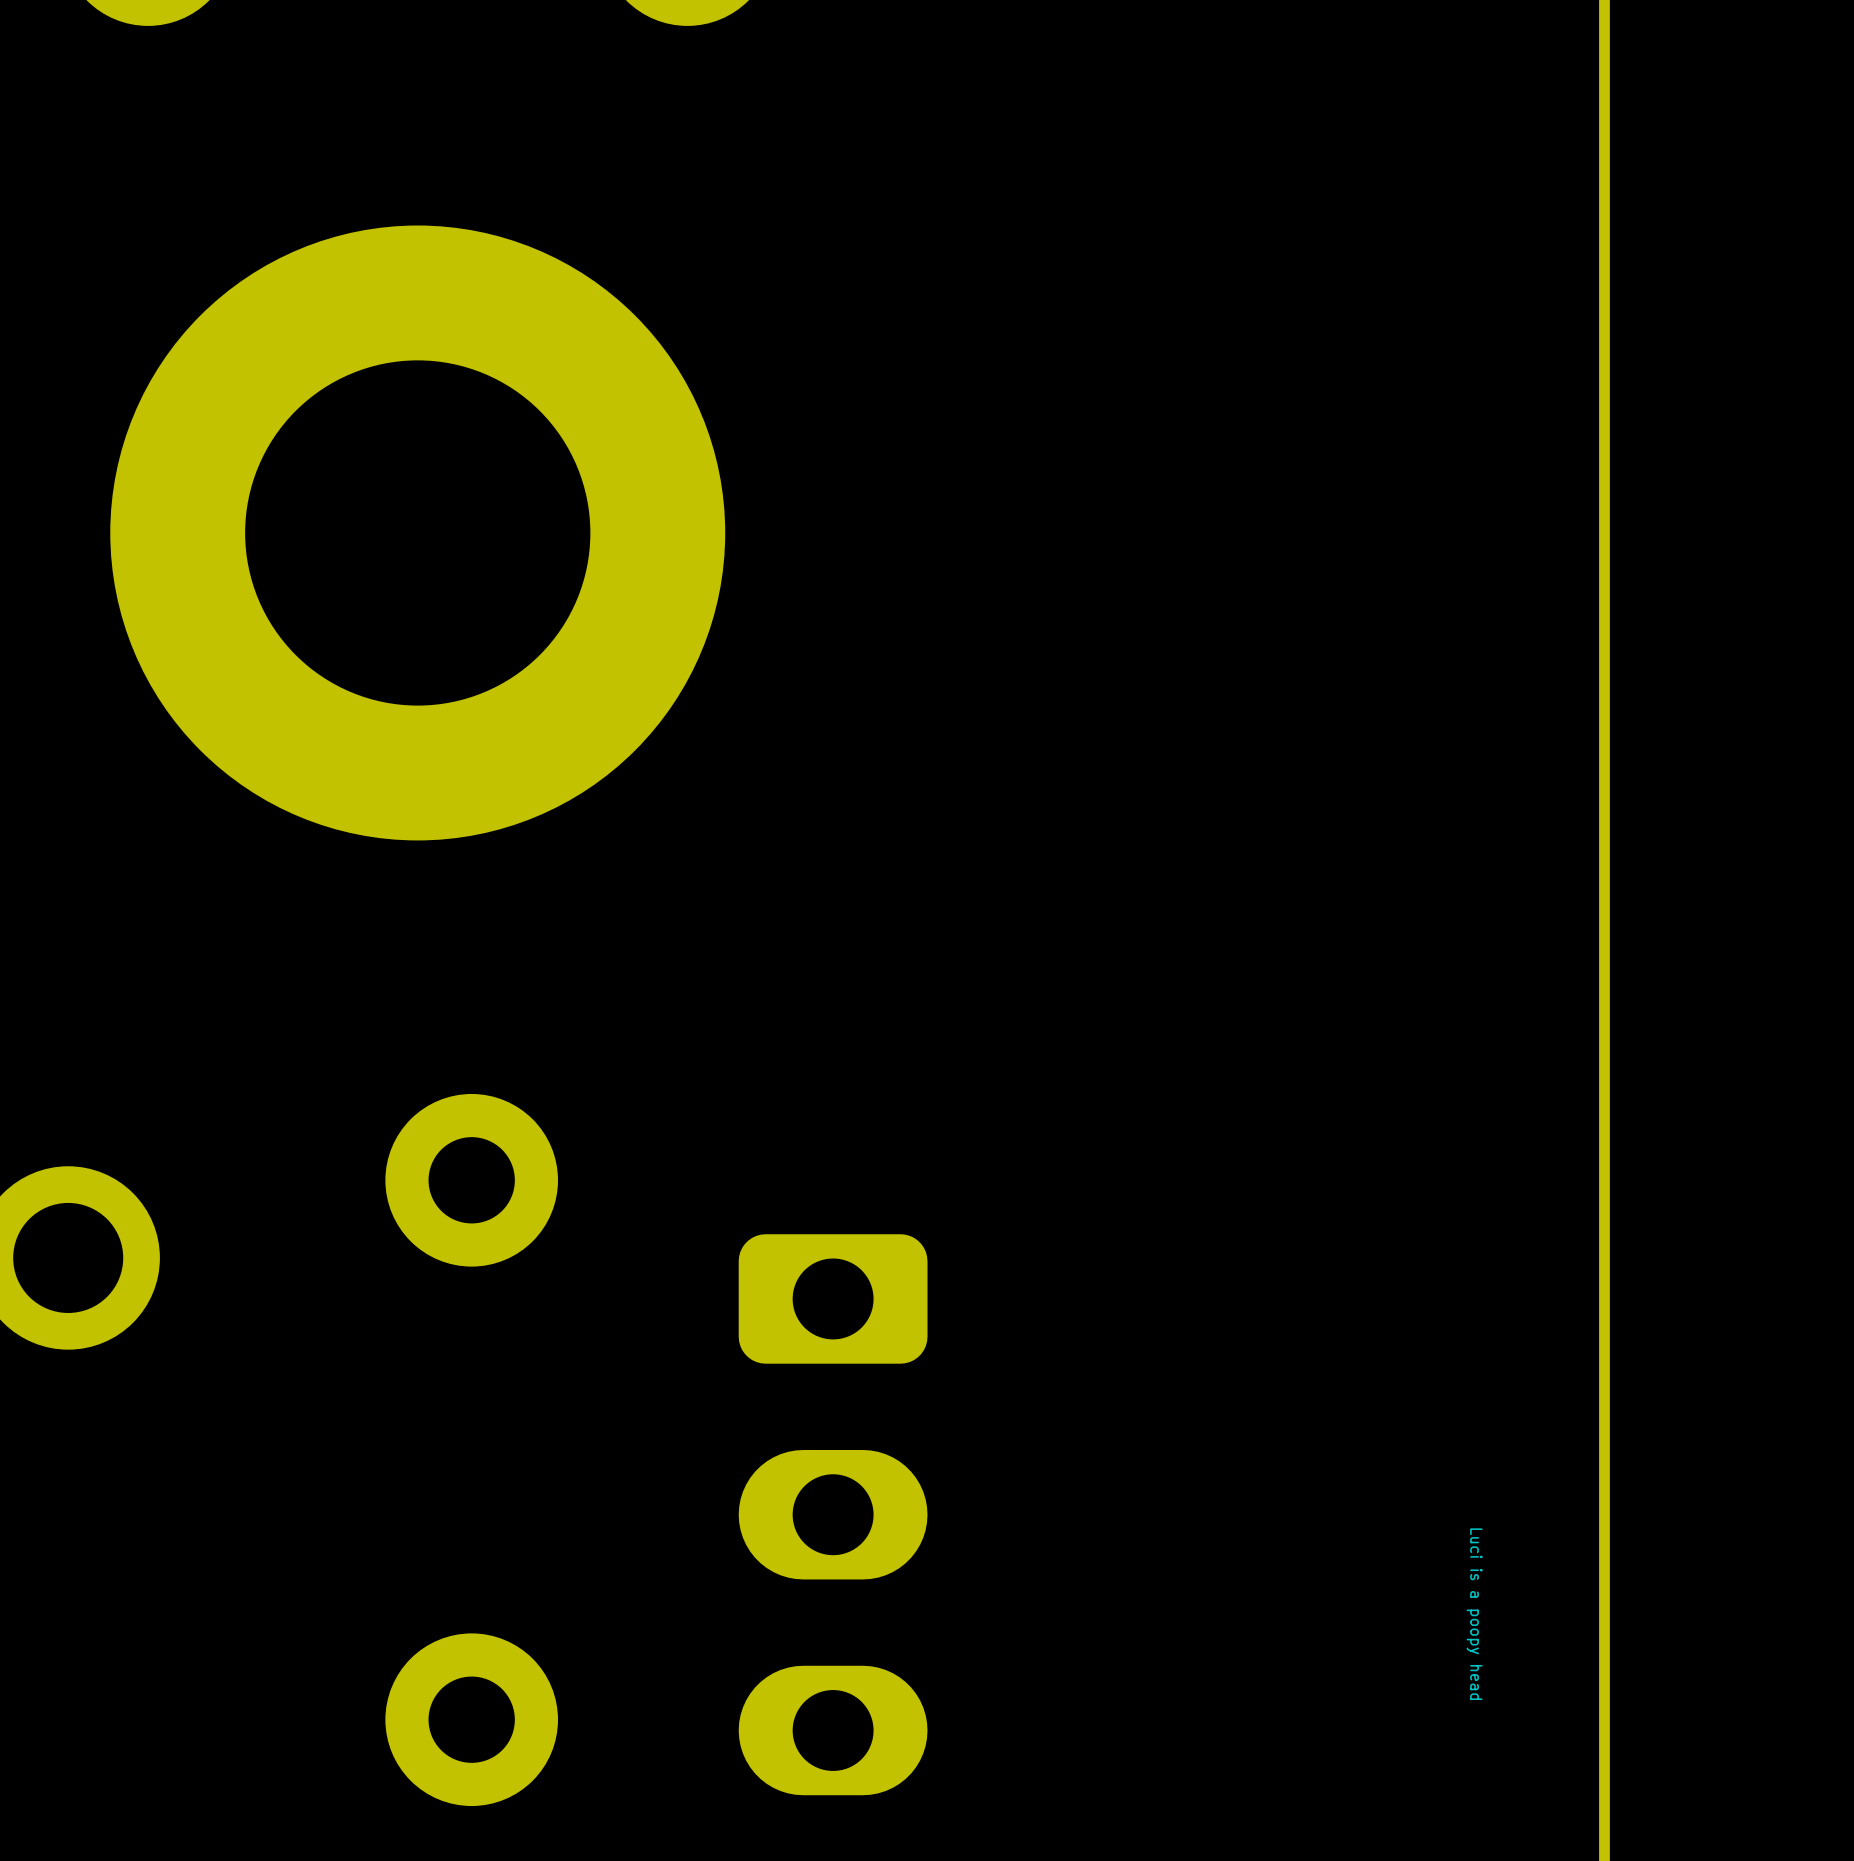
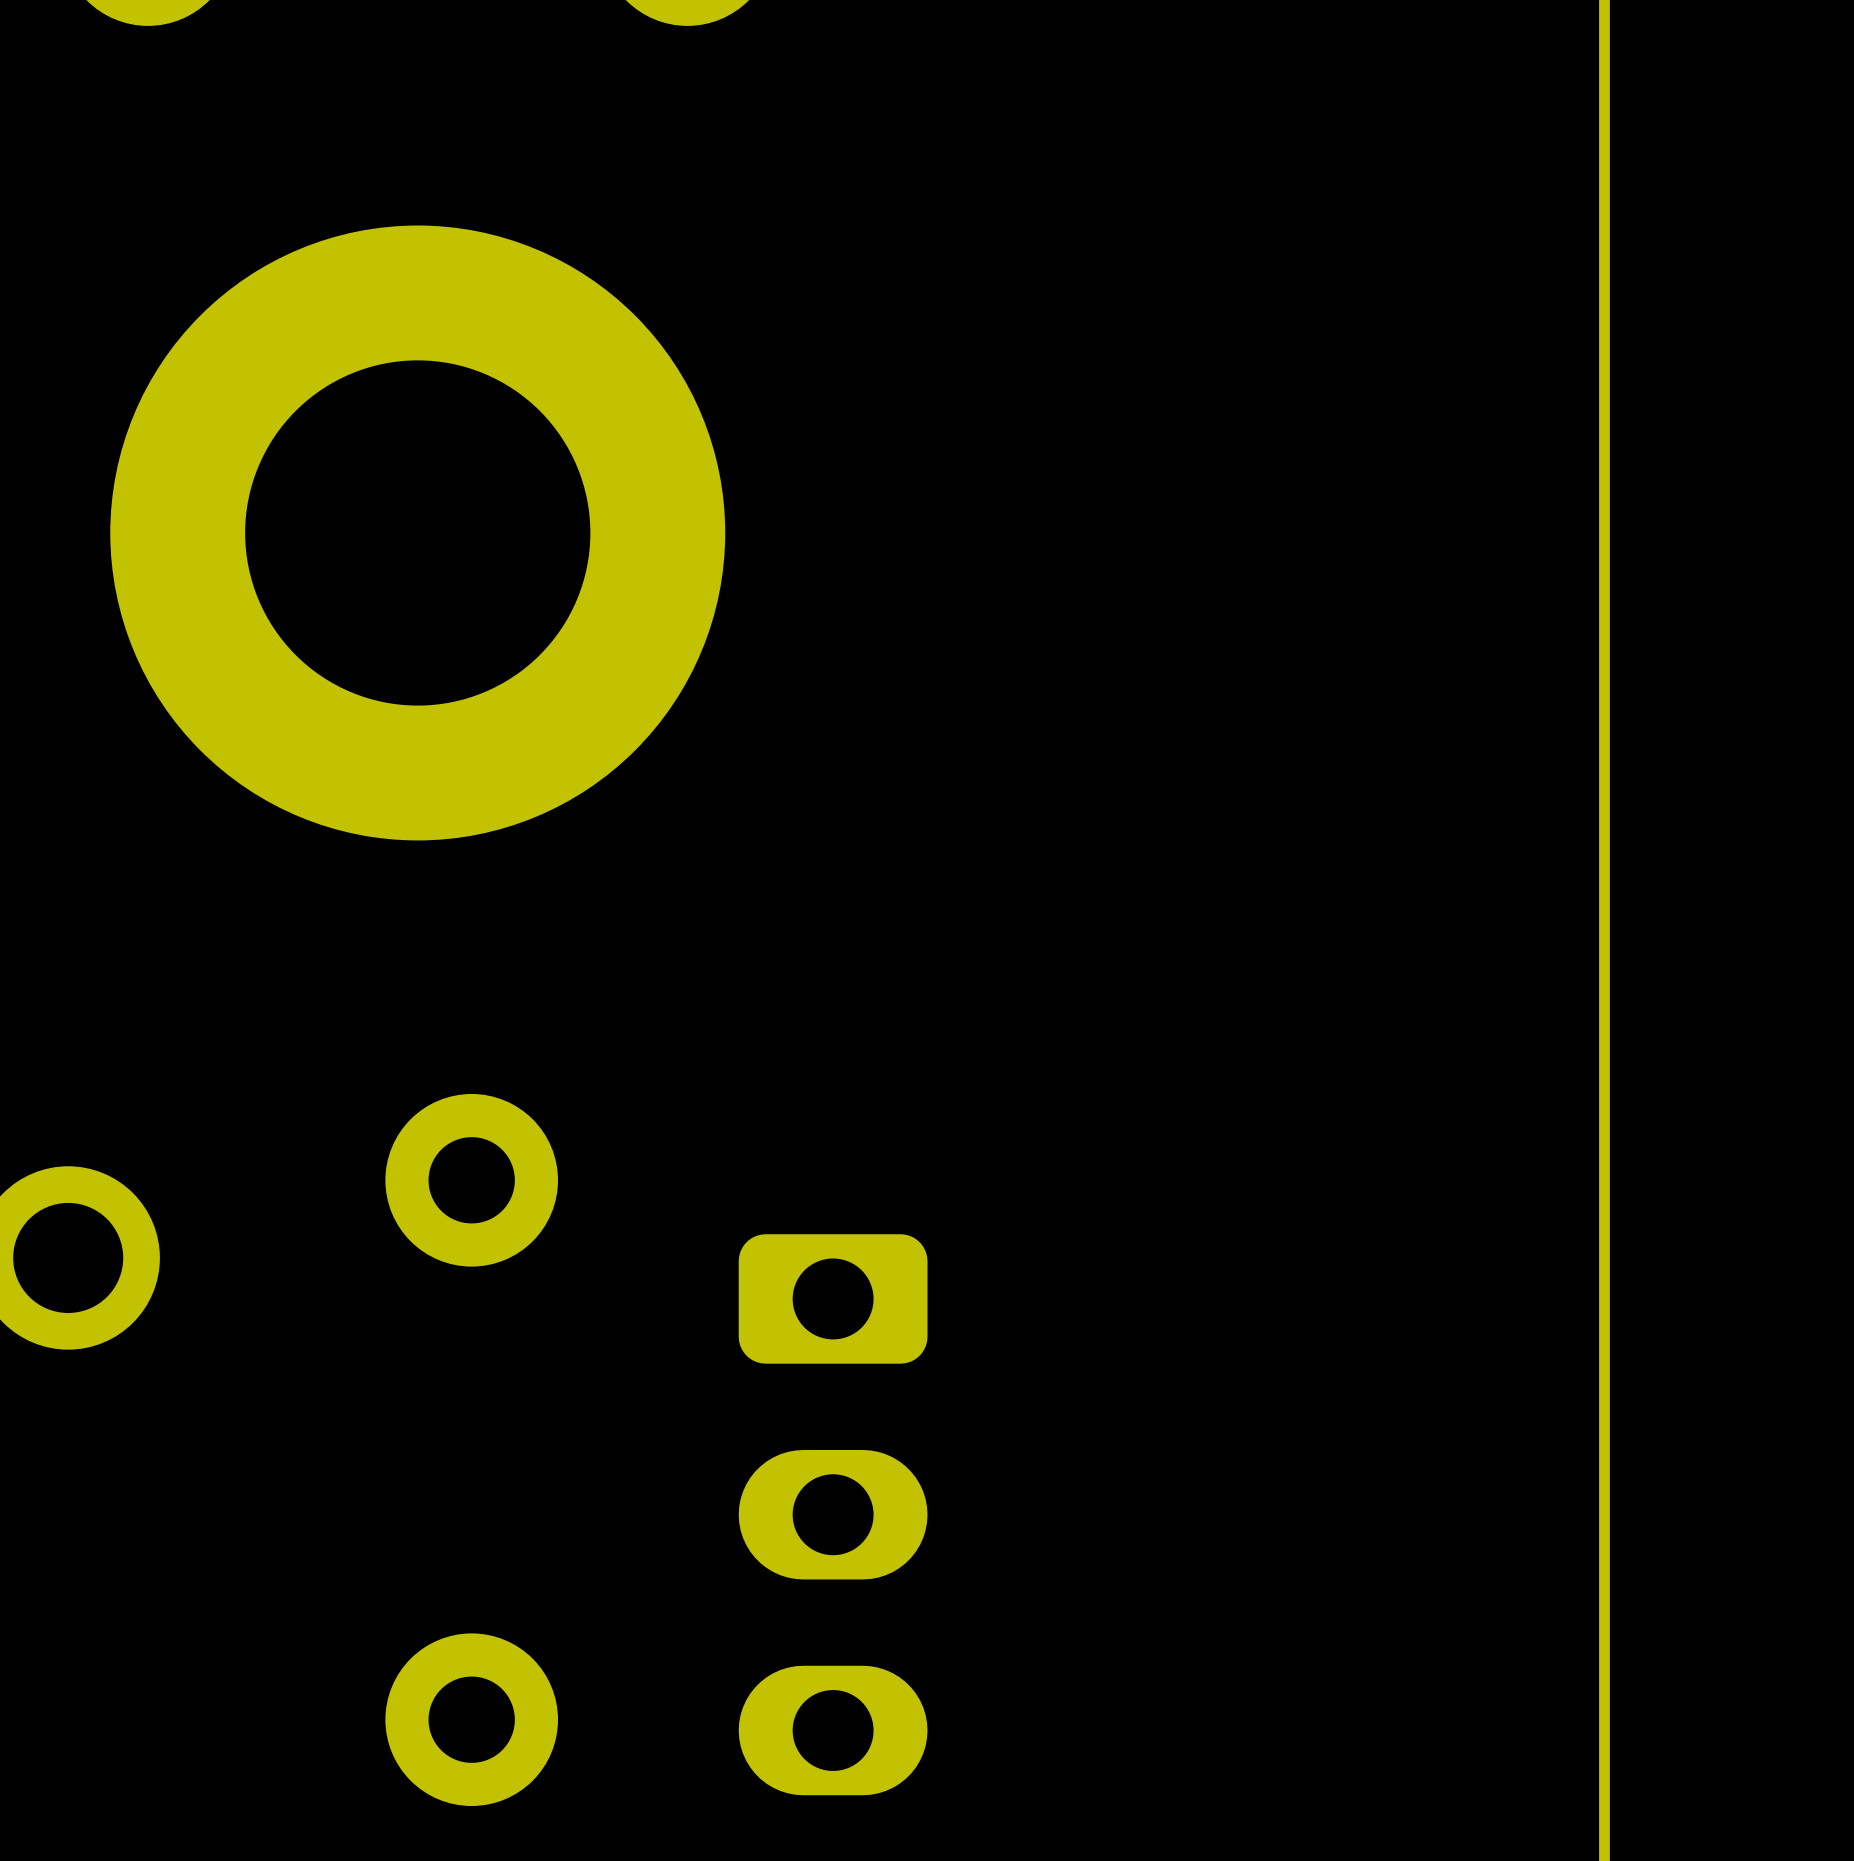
text: Luci is a poopy head (1474, 1614) -> none

